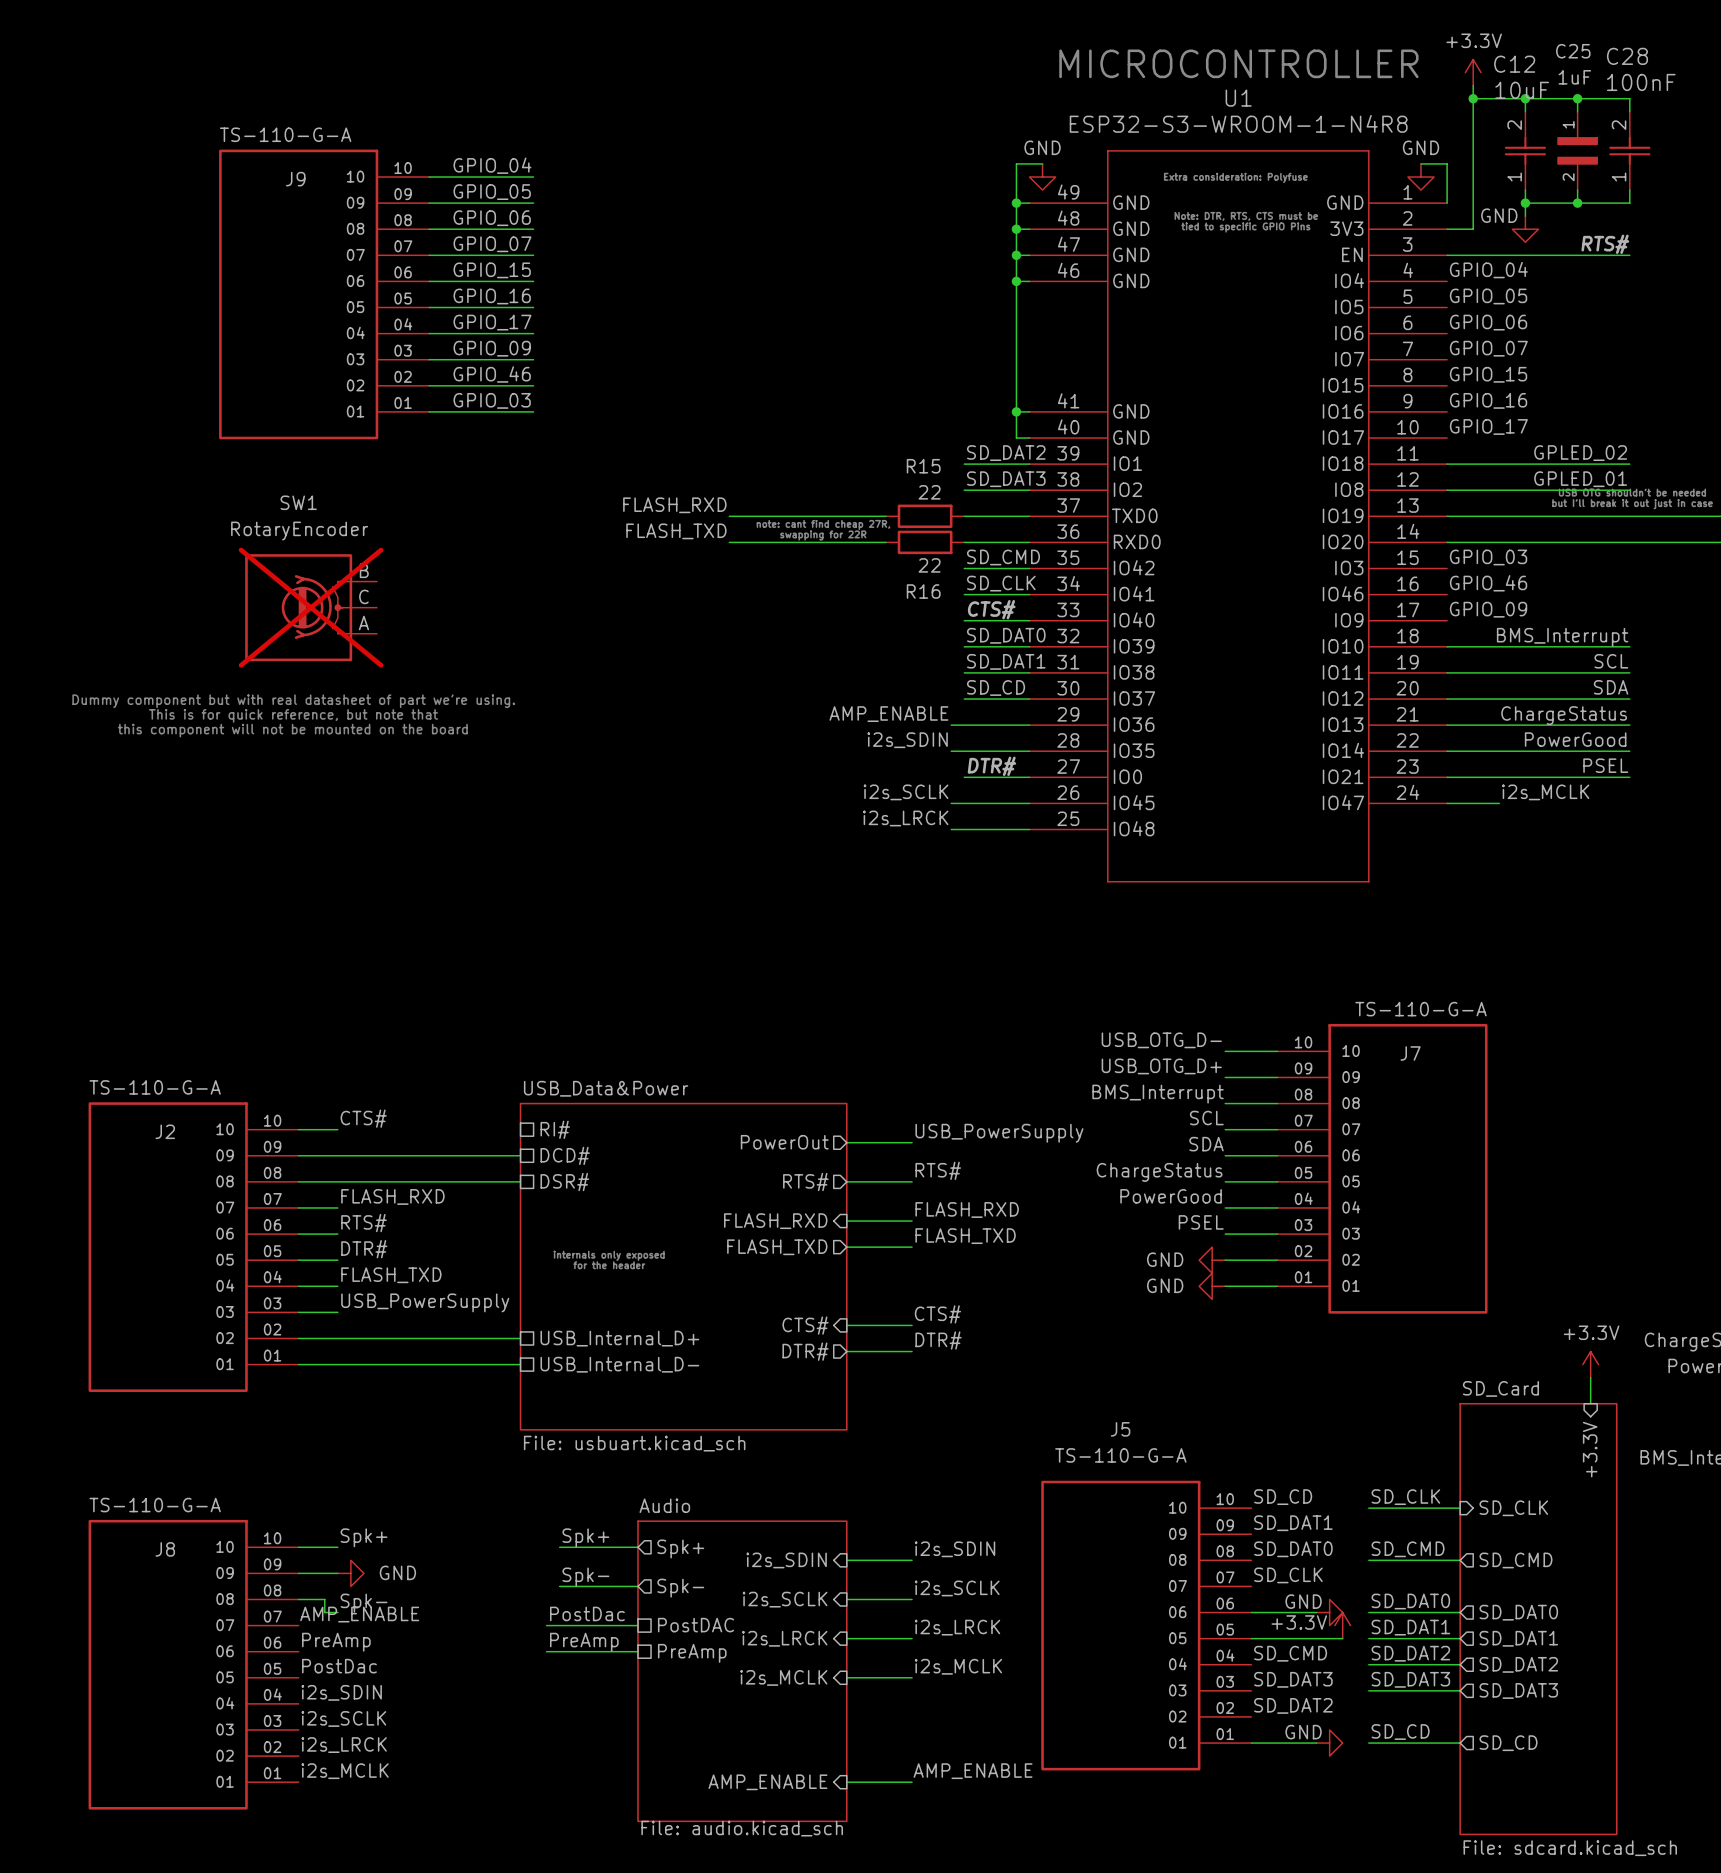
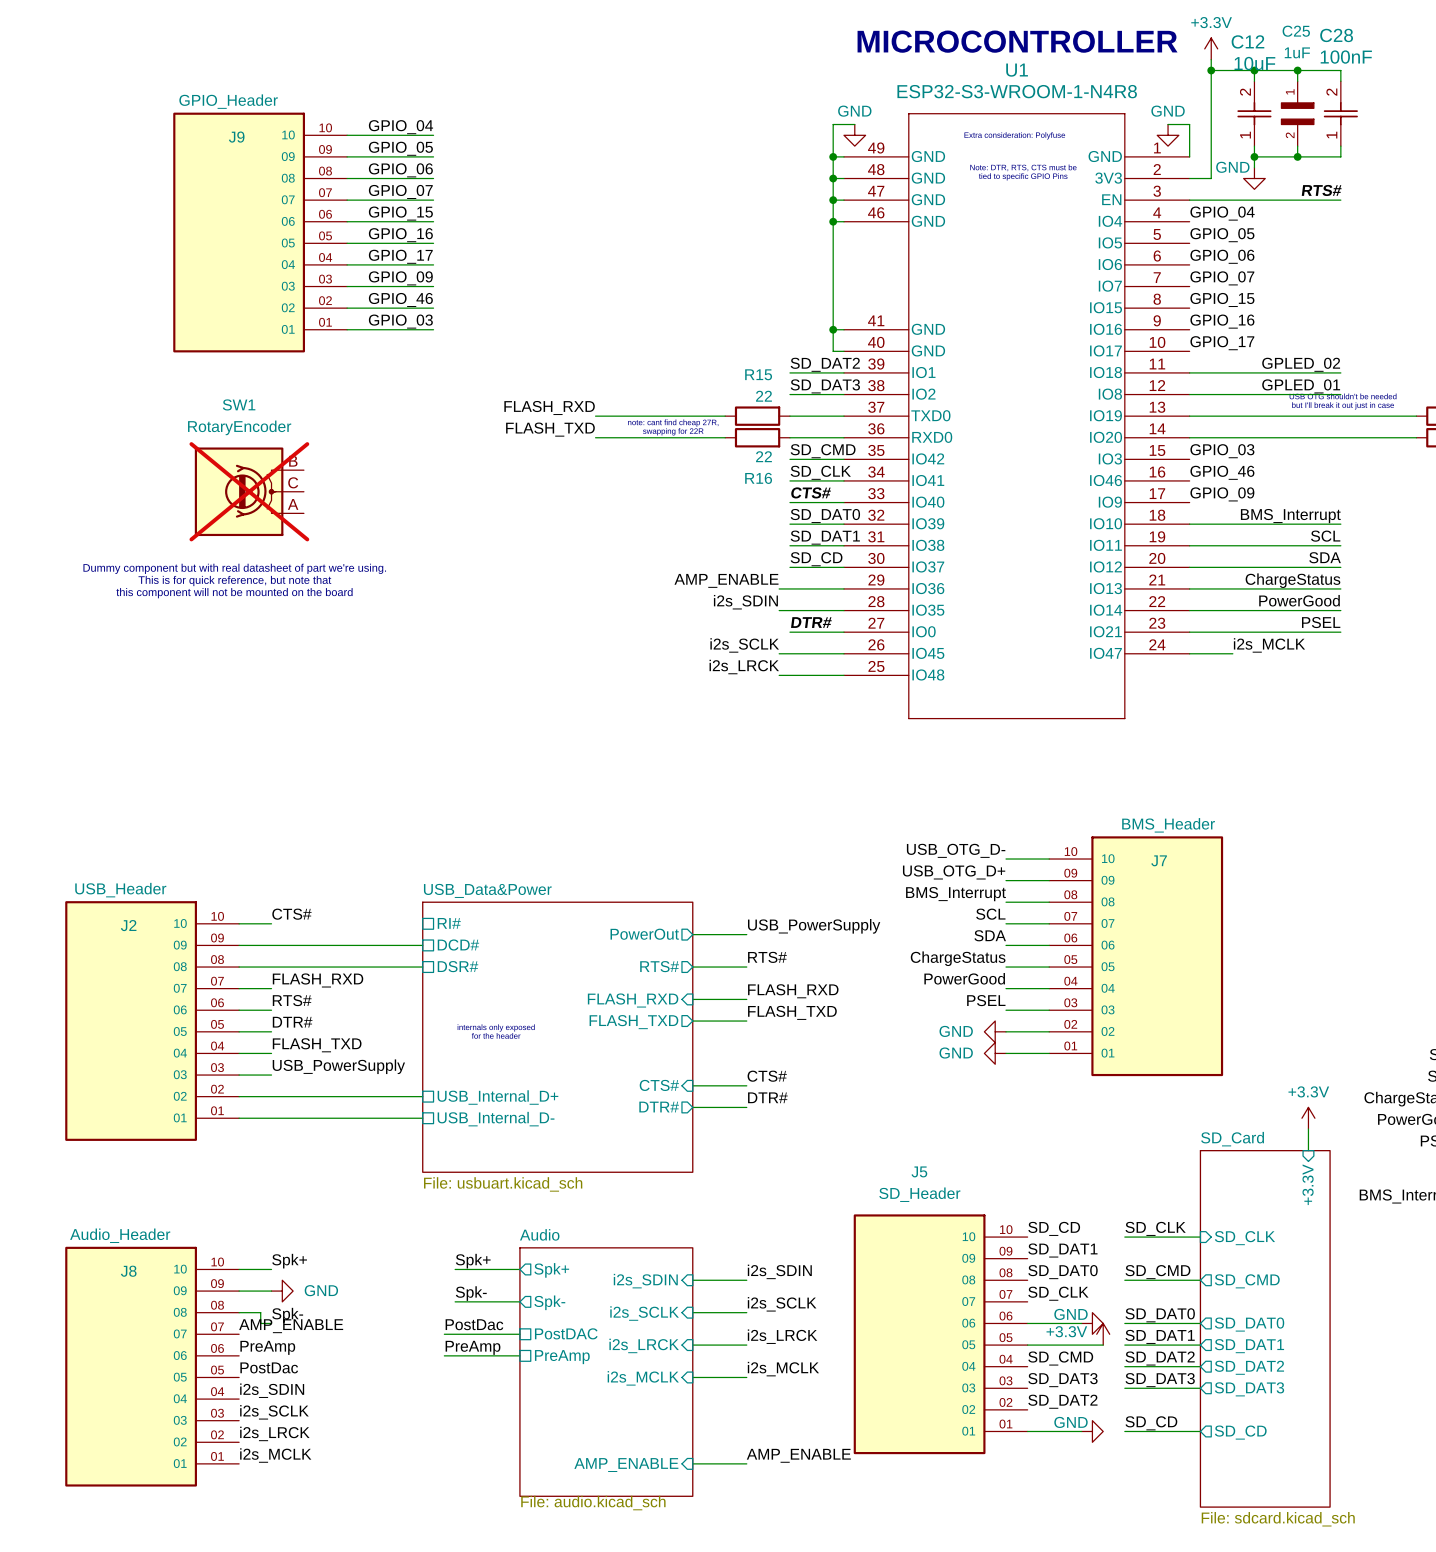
J9 value: TS-110-G-A (285, 134) -> GPIO_Header (228, 101)
J7 value: TS-110-G-A (1421, 1009) -> BMS_Header (1168, 825)
J2 value: TS-110-G-A (155, 1087) -> USB_Header (120, 890)
J5 value: TS-110-G-A (1120, 1455) -> SD_Header (919, 1194)
J8 value: TS-110-G-A (155, 1505) -> Audio_Header (120, 1235)

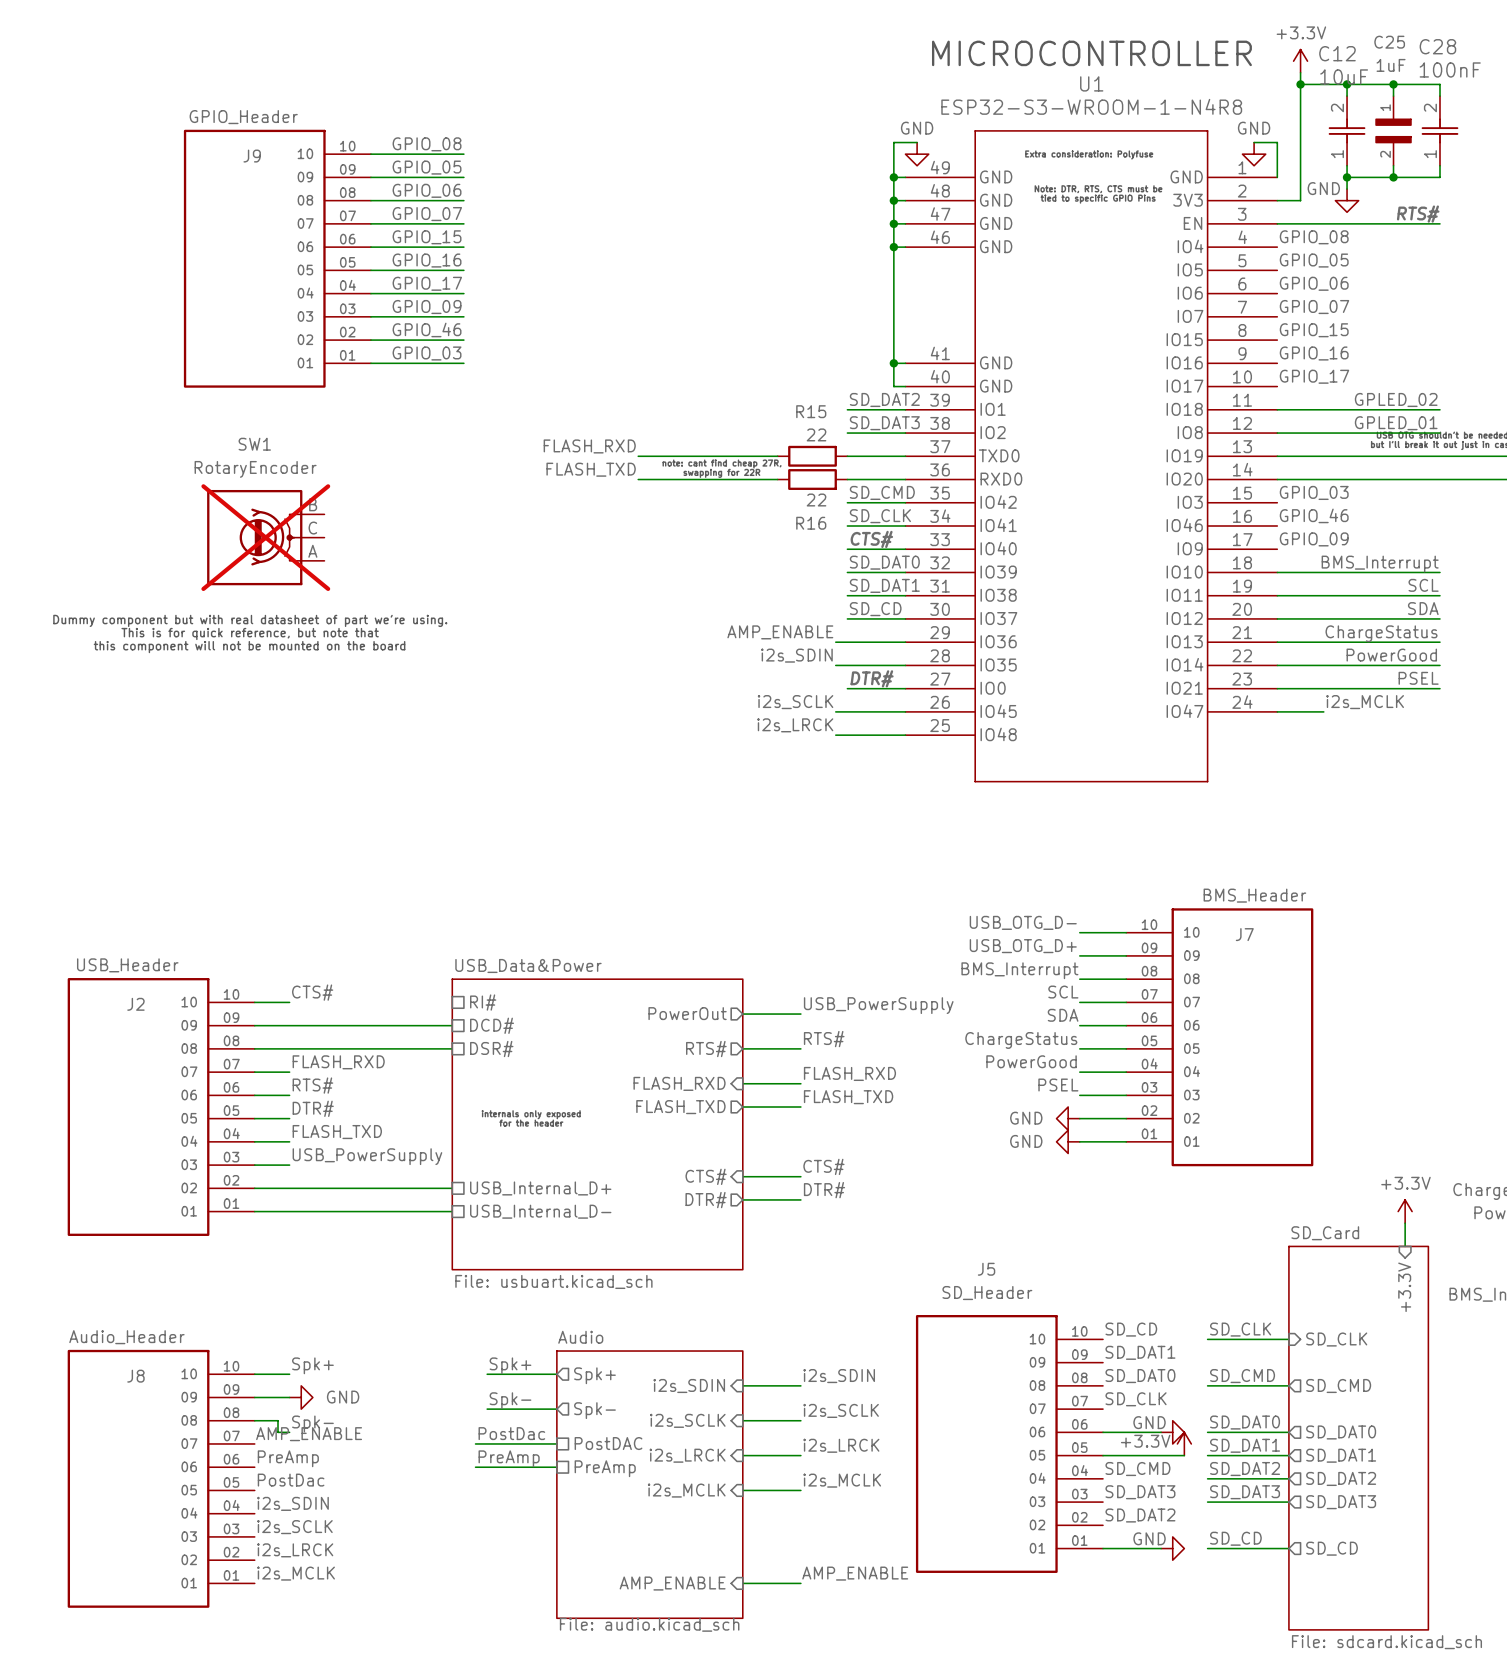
label: GPIO_04 (400, 127) -> GPIO_08 (427, 144)
label: GPIO_04 (1222, 213) -> GPIO_08 (1314, 237)

